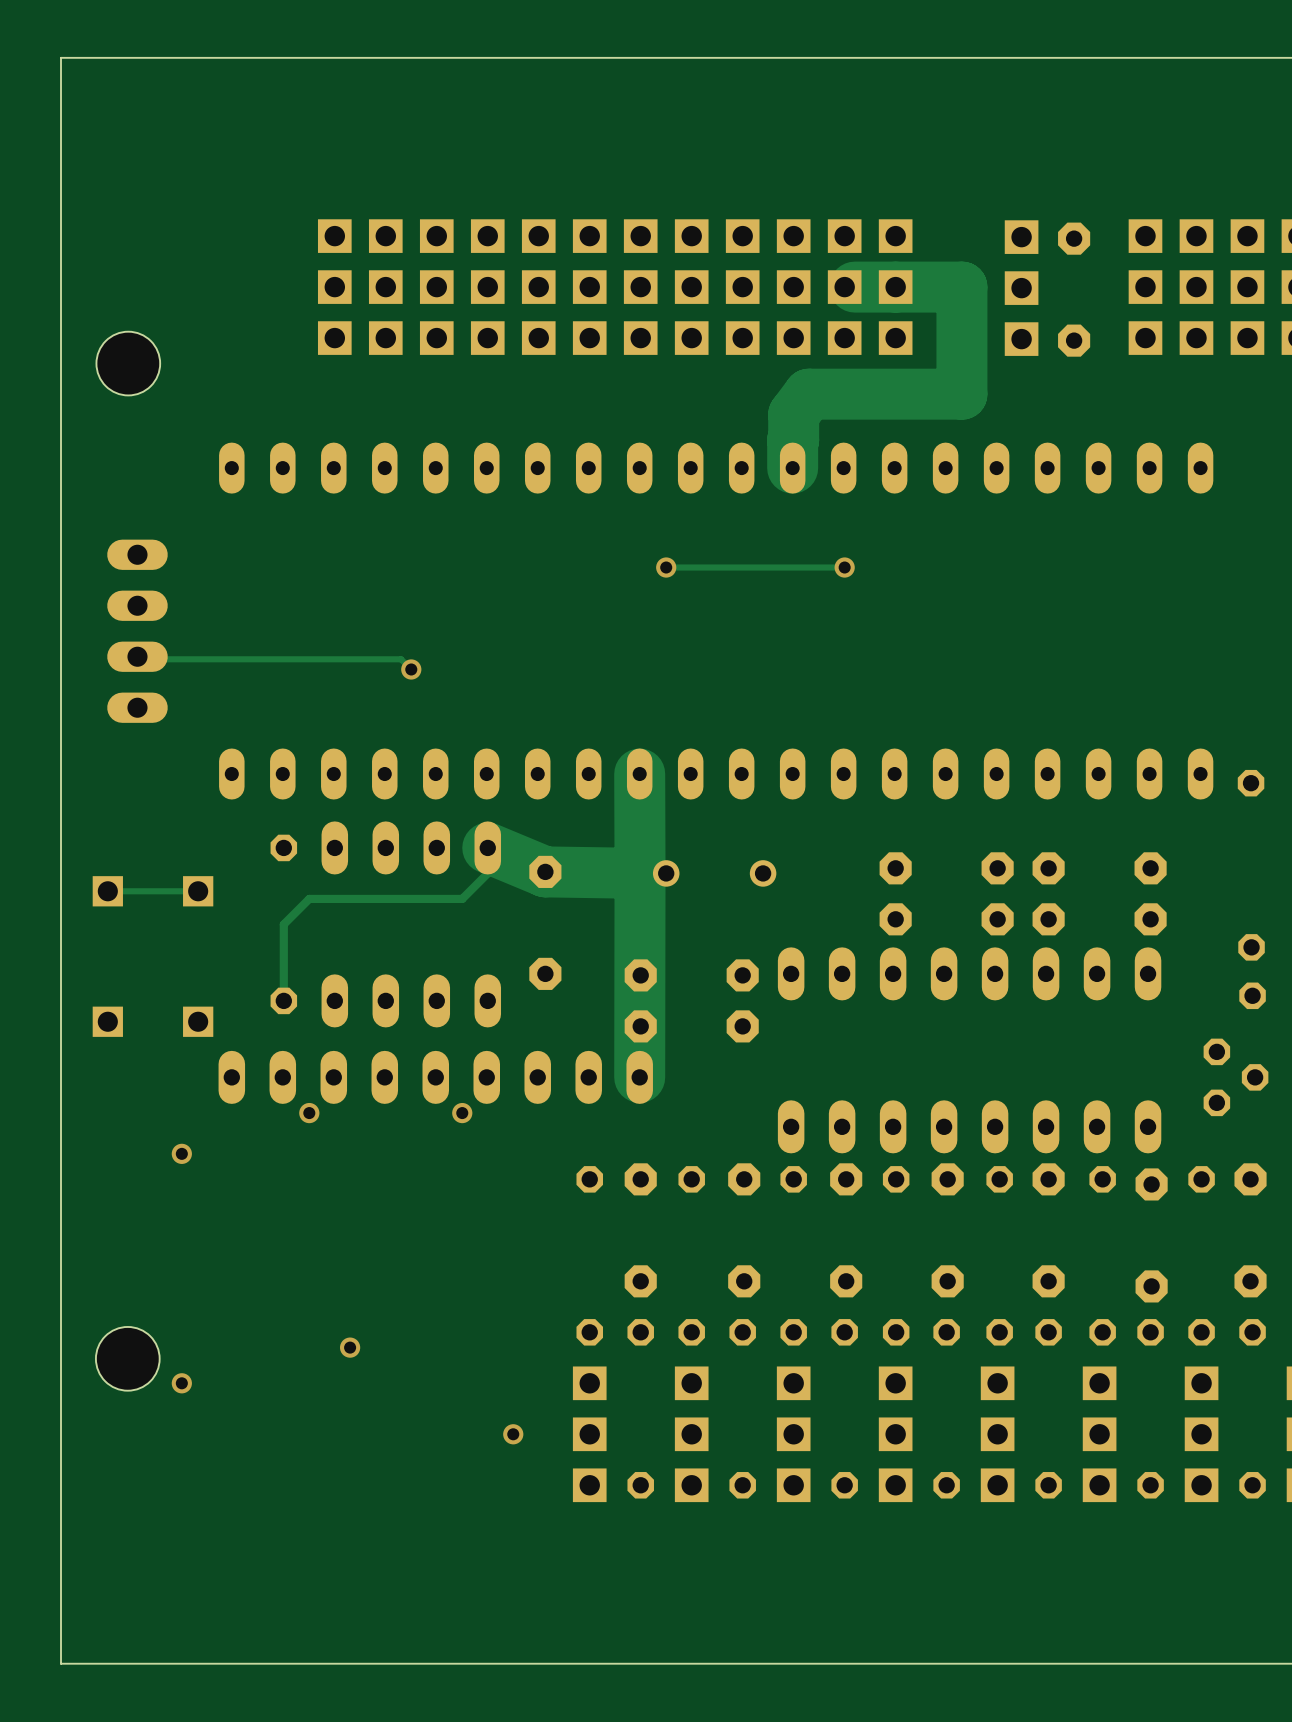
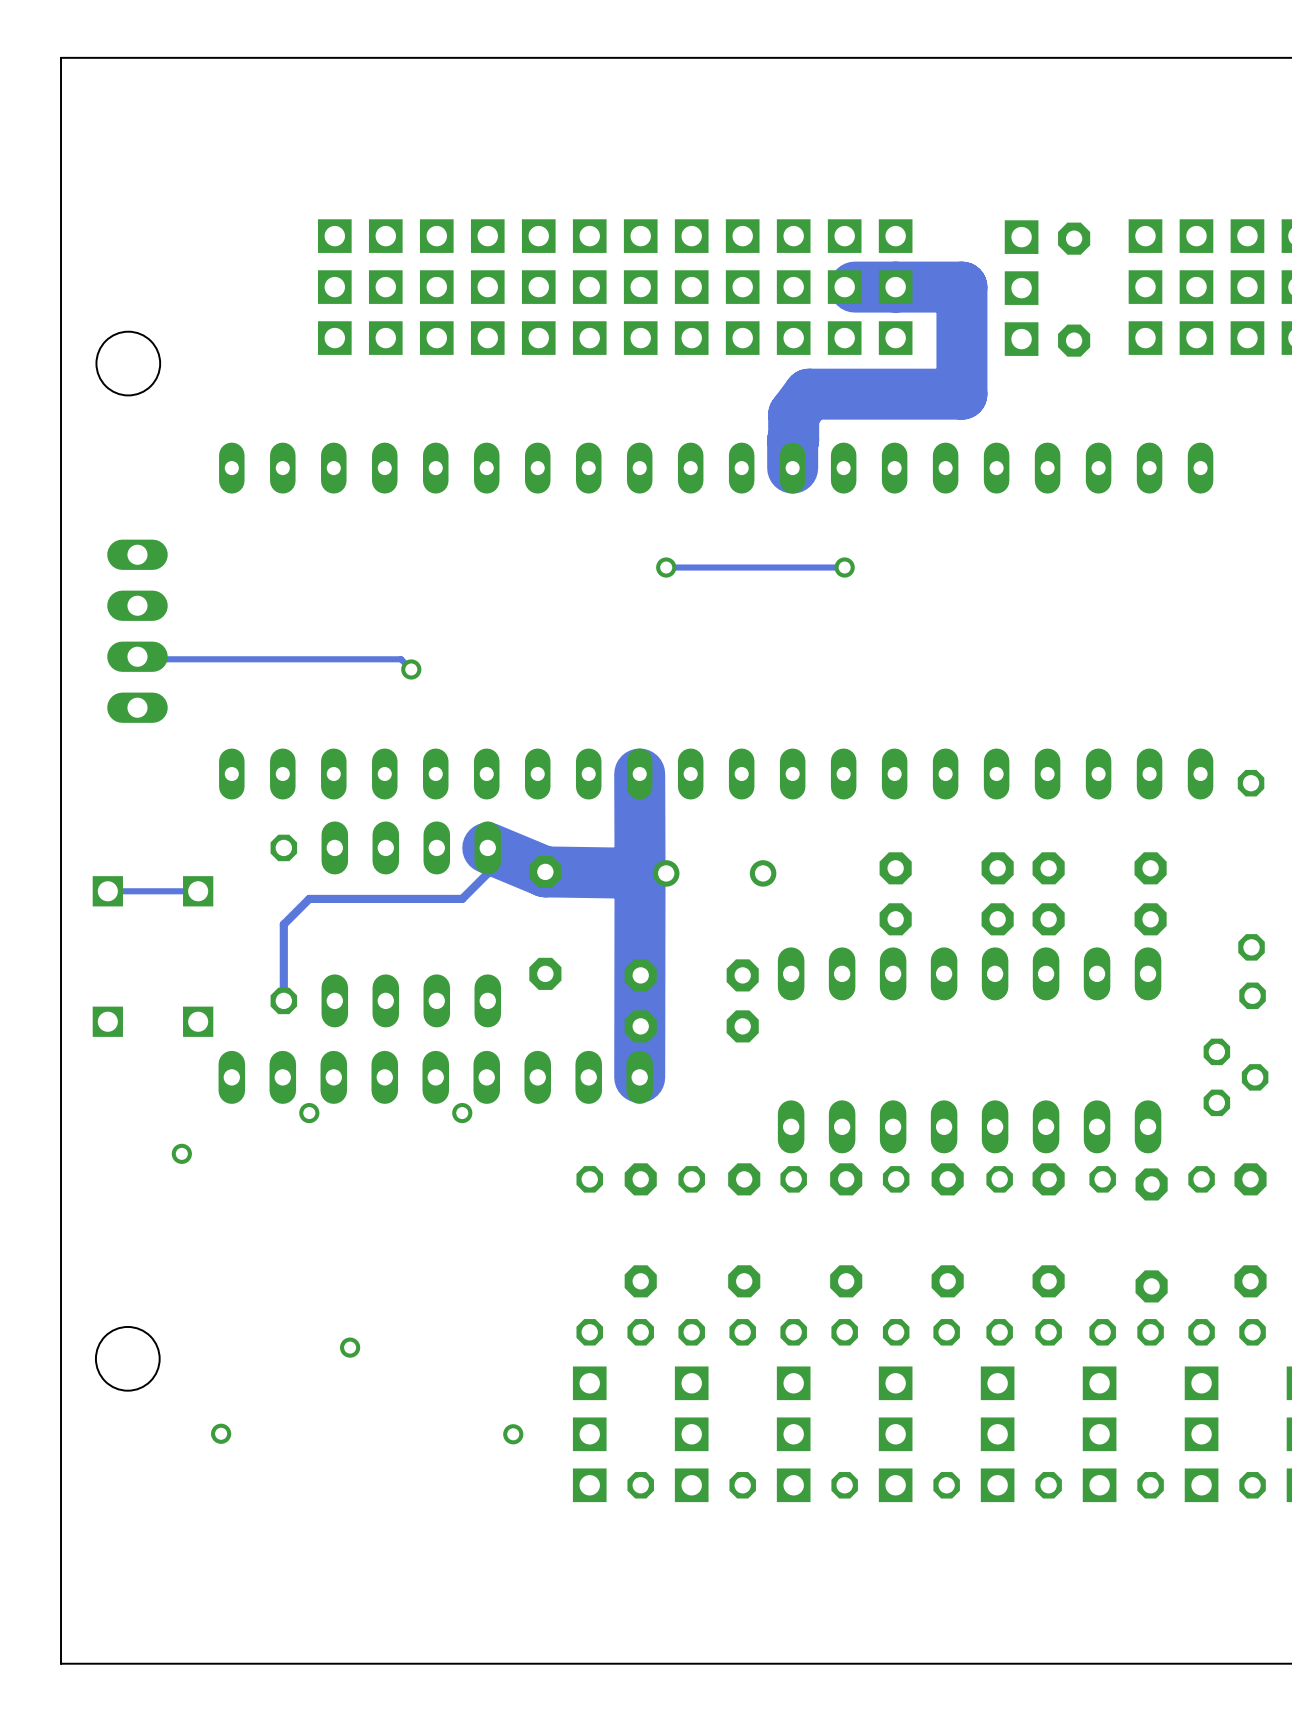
via position: (181, 1383) -> (221, 1433)

